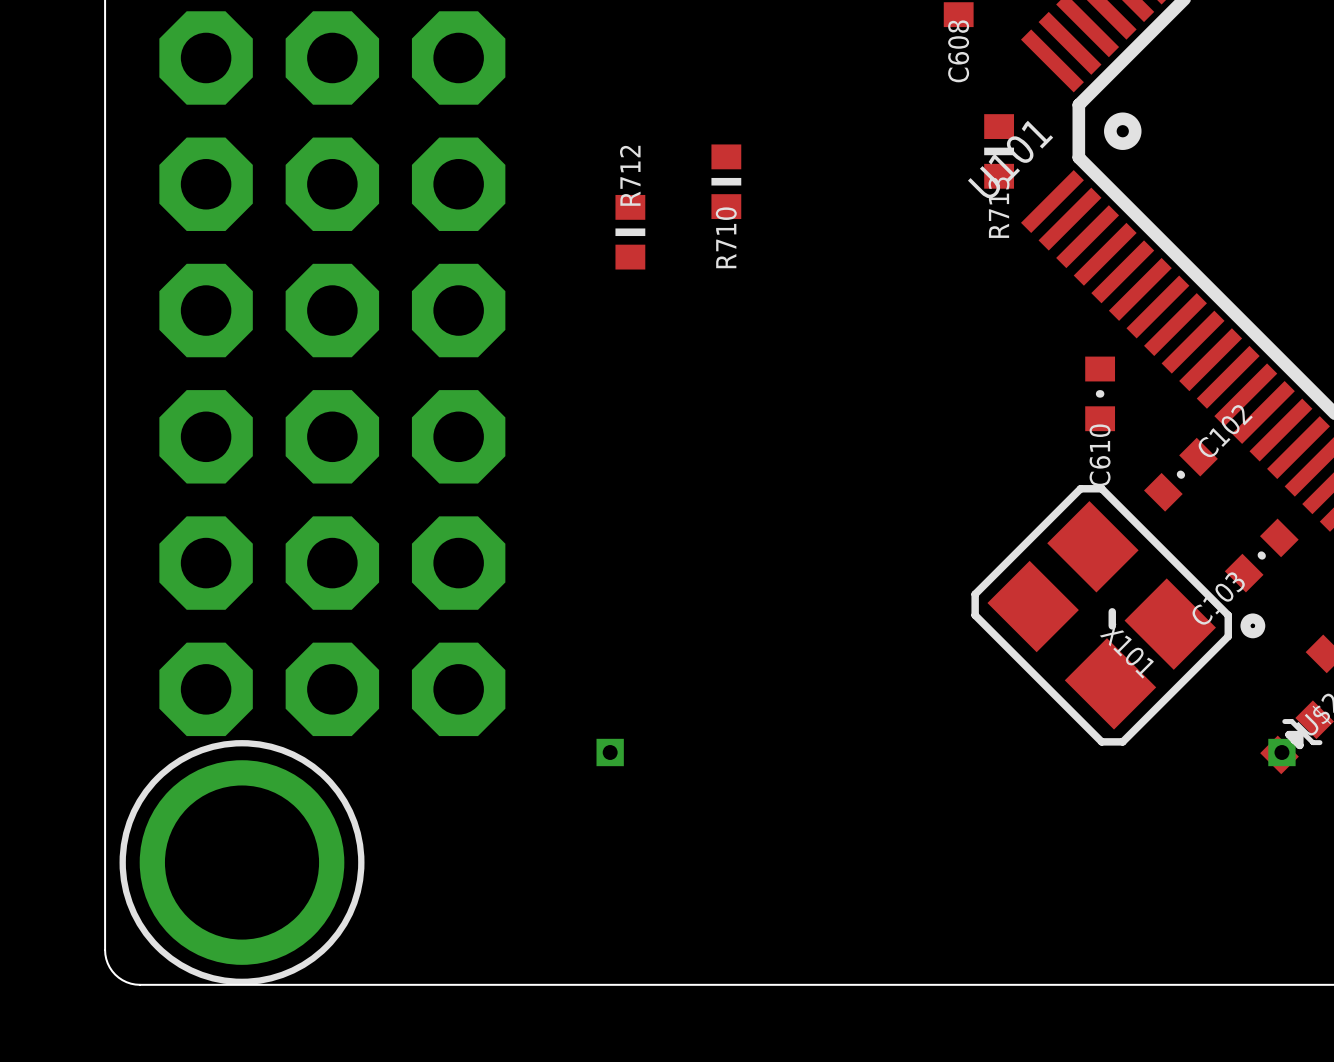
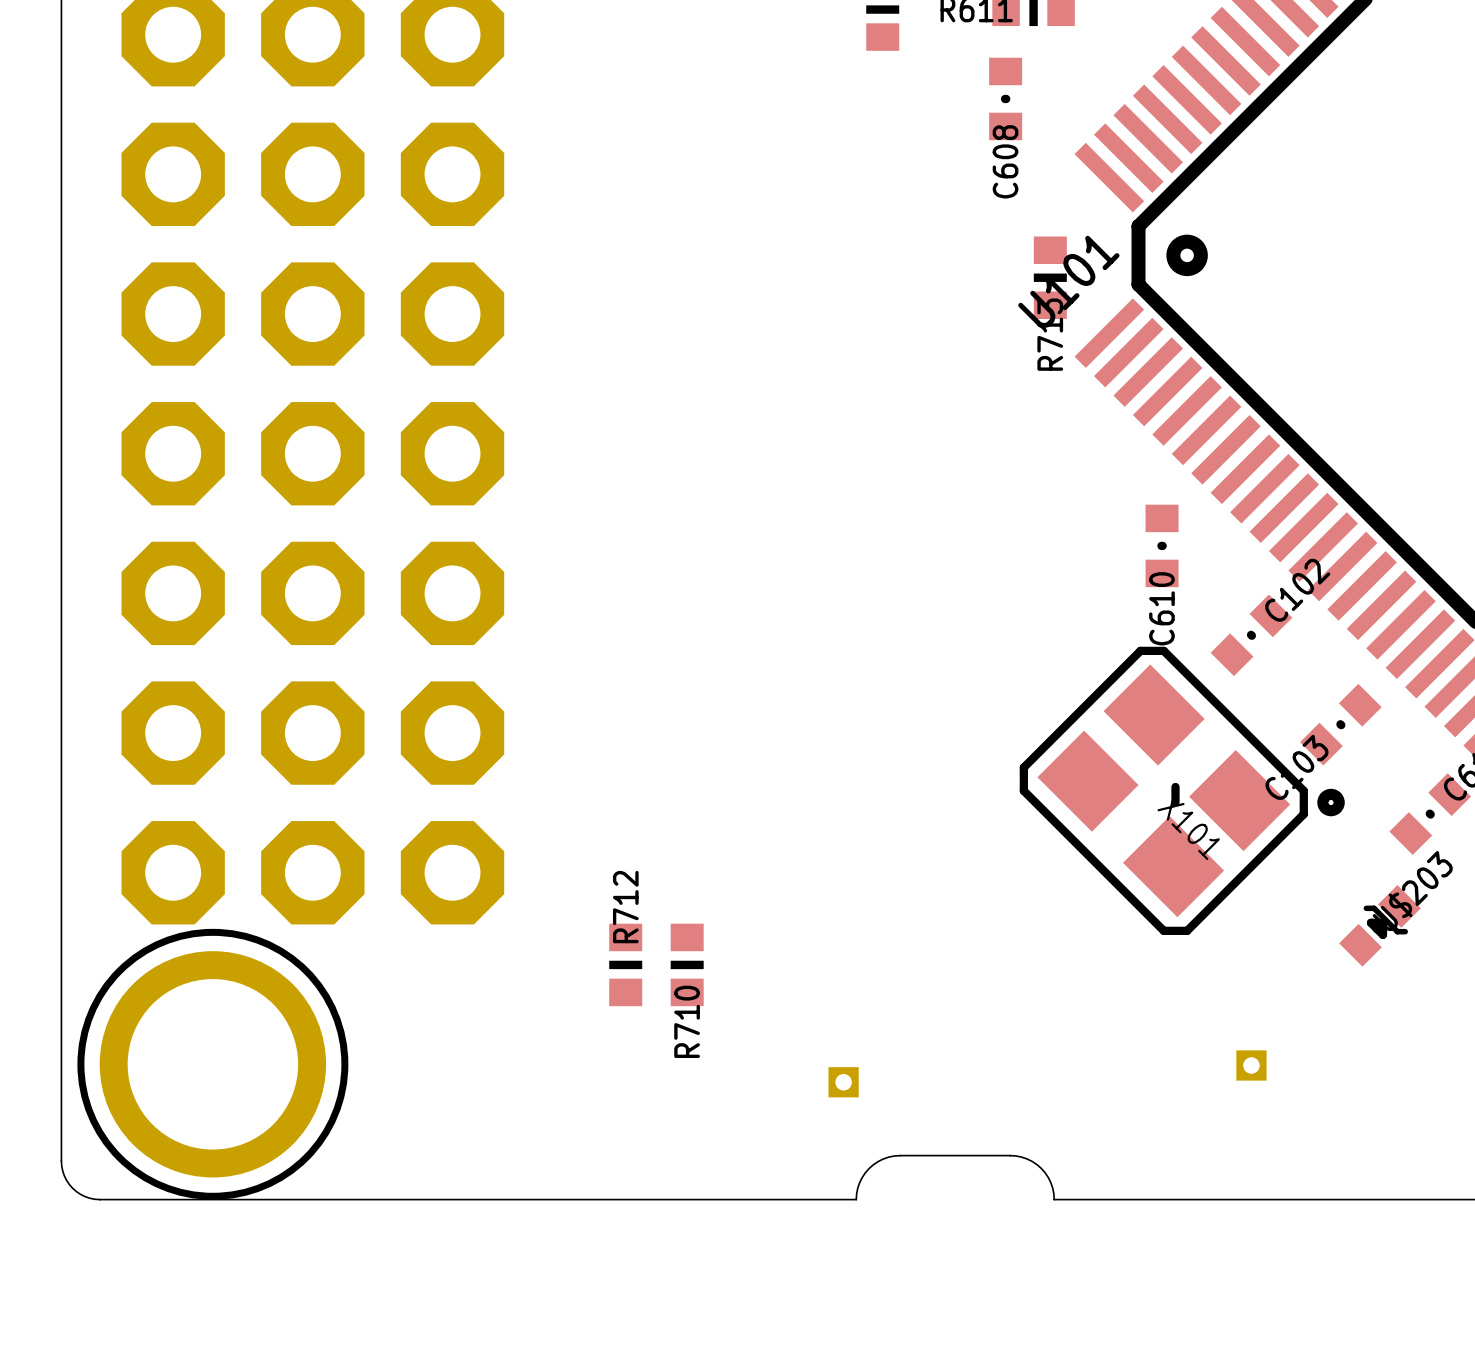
R710 position: (726, 181) -> (687, 964)
R712 position: (630, 232) -> (625, 964)
part position: (610, 752) -> (843, 1082)
part position: (1281, 752) -> (1251, 1065)
board edge: (823, 984) (1002, 984) -> (856, 1199) (859, 1182) (869, 1168) (883, 1158) (900, 1155) (1021, 1157) (1037, 1164) (1045, 1172) (1050, 1182) (1054, 1199)

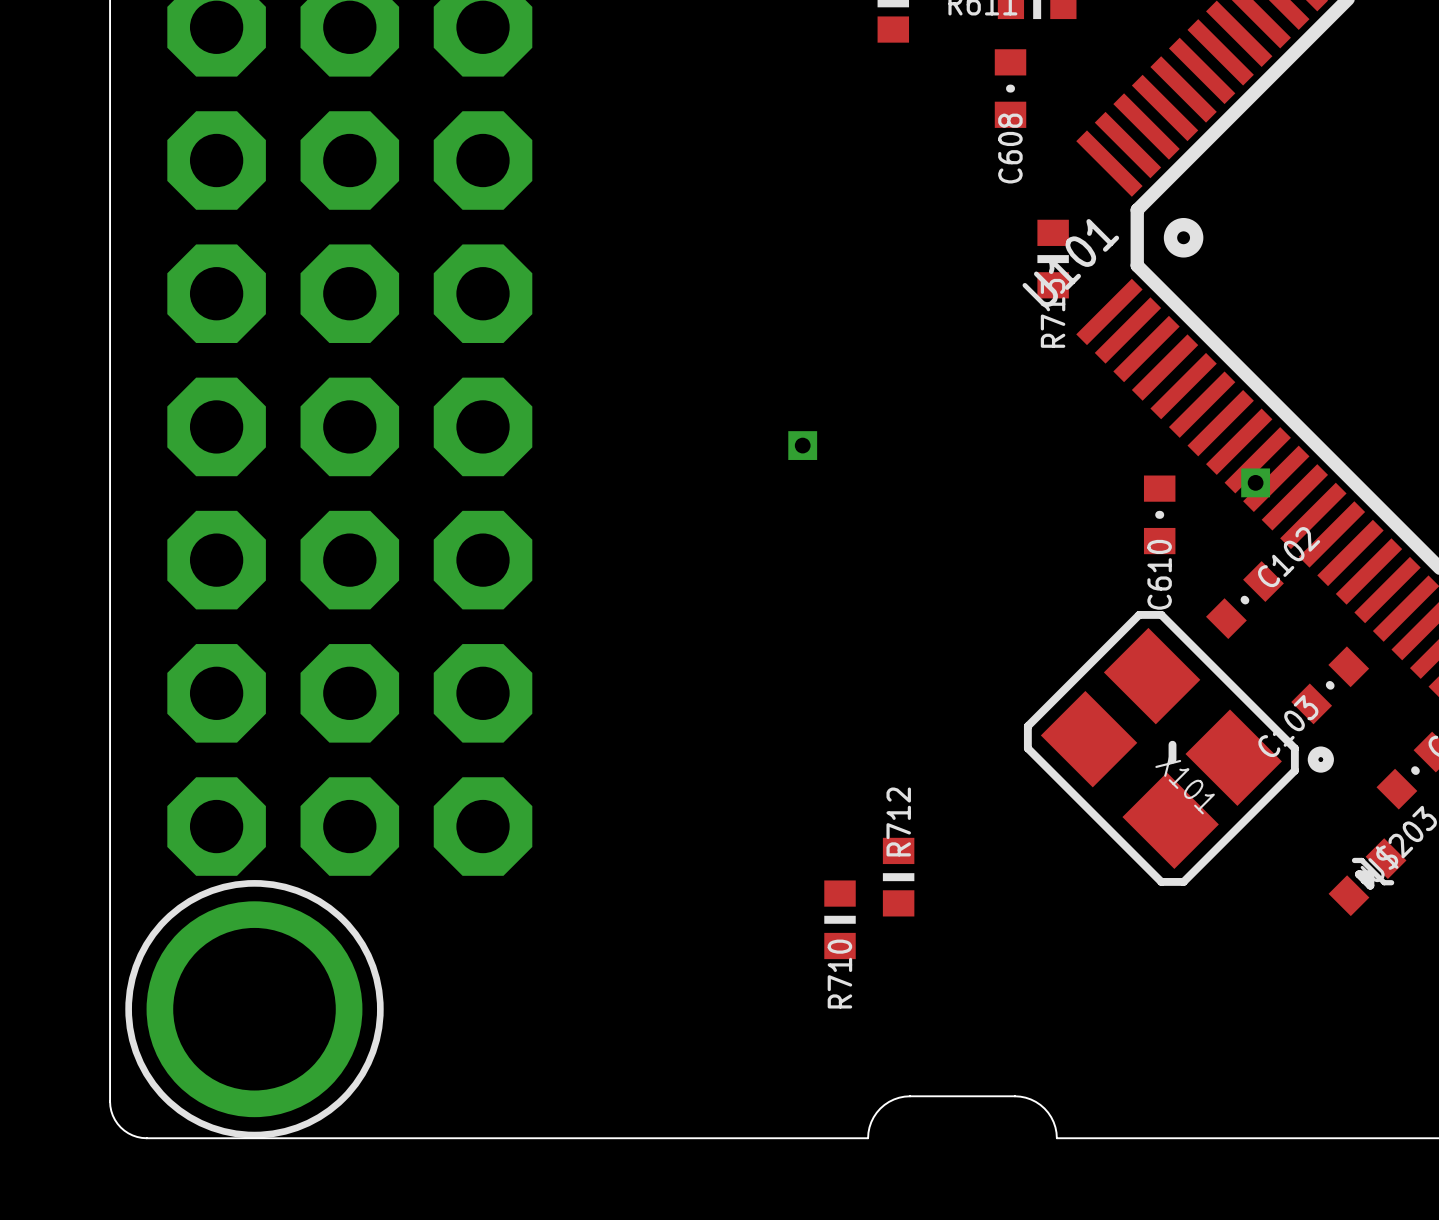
part: none -> (802, 445)
part: none -> (1255, 482)
R712 position: (625, 964) -> (898, 877)
R710 position: (687, 964) -> (840, 919)
part: (1251, 1065) -> none
part: (843, 1082) -> none

